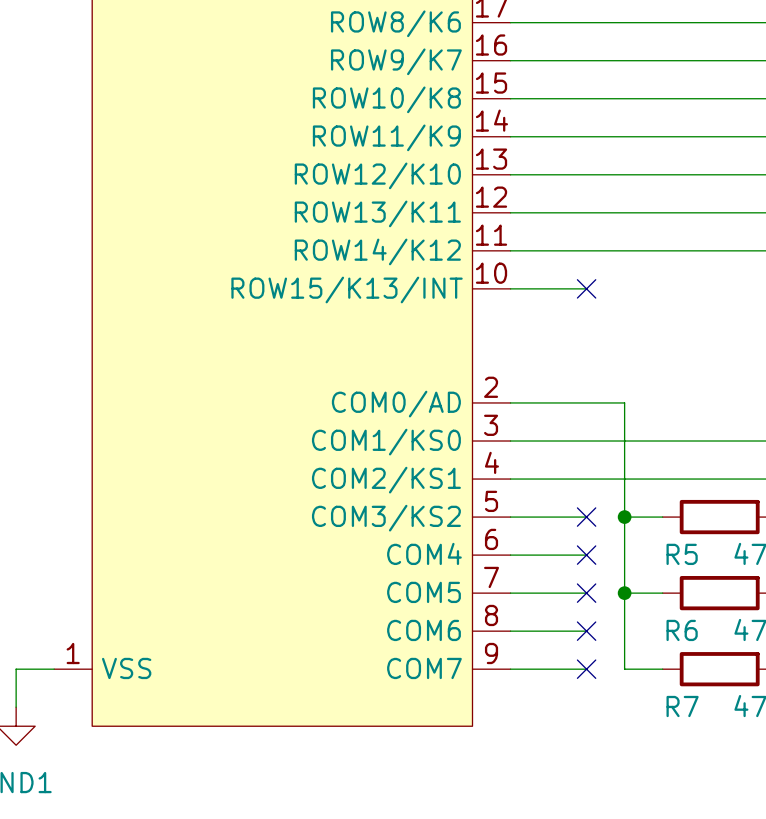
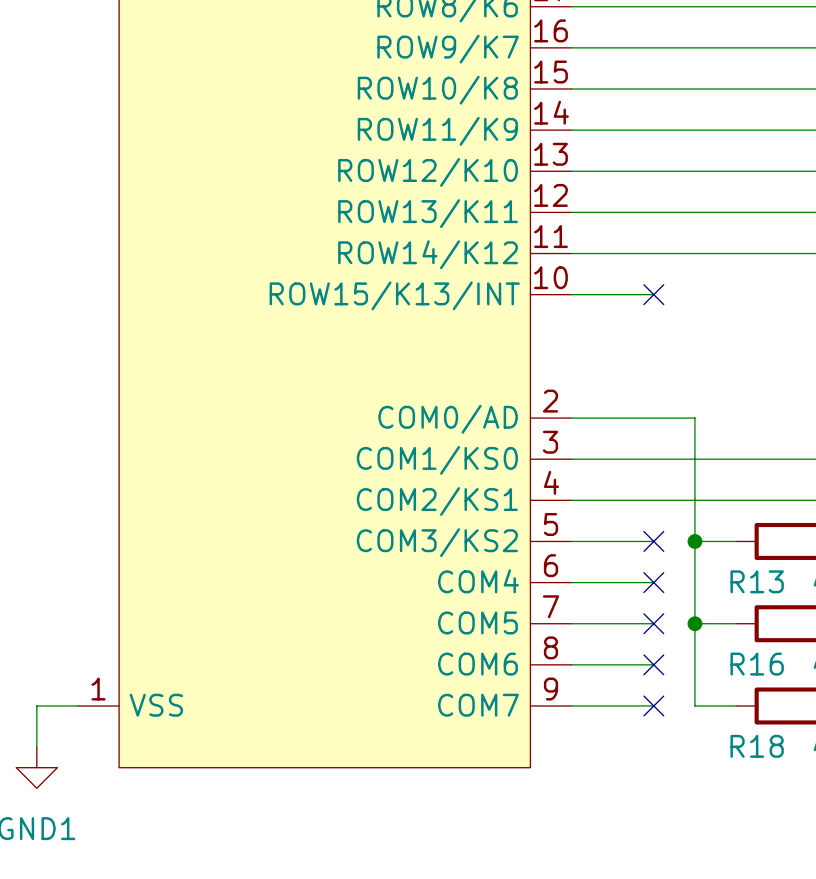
R5 name: R5 (682, 554) -> R13 (757, 581)
R6 name: R6 (682, 630) -> R16 (757, 664)
R7 name: R7 (682, 706) -> R18 (757, 746)

